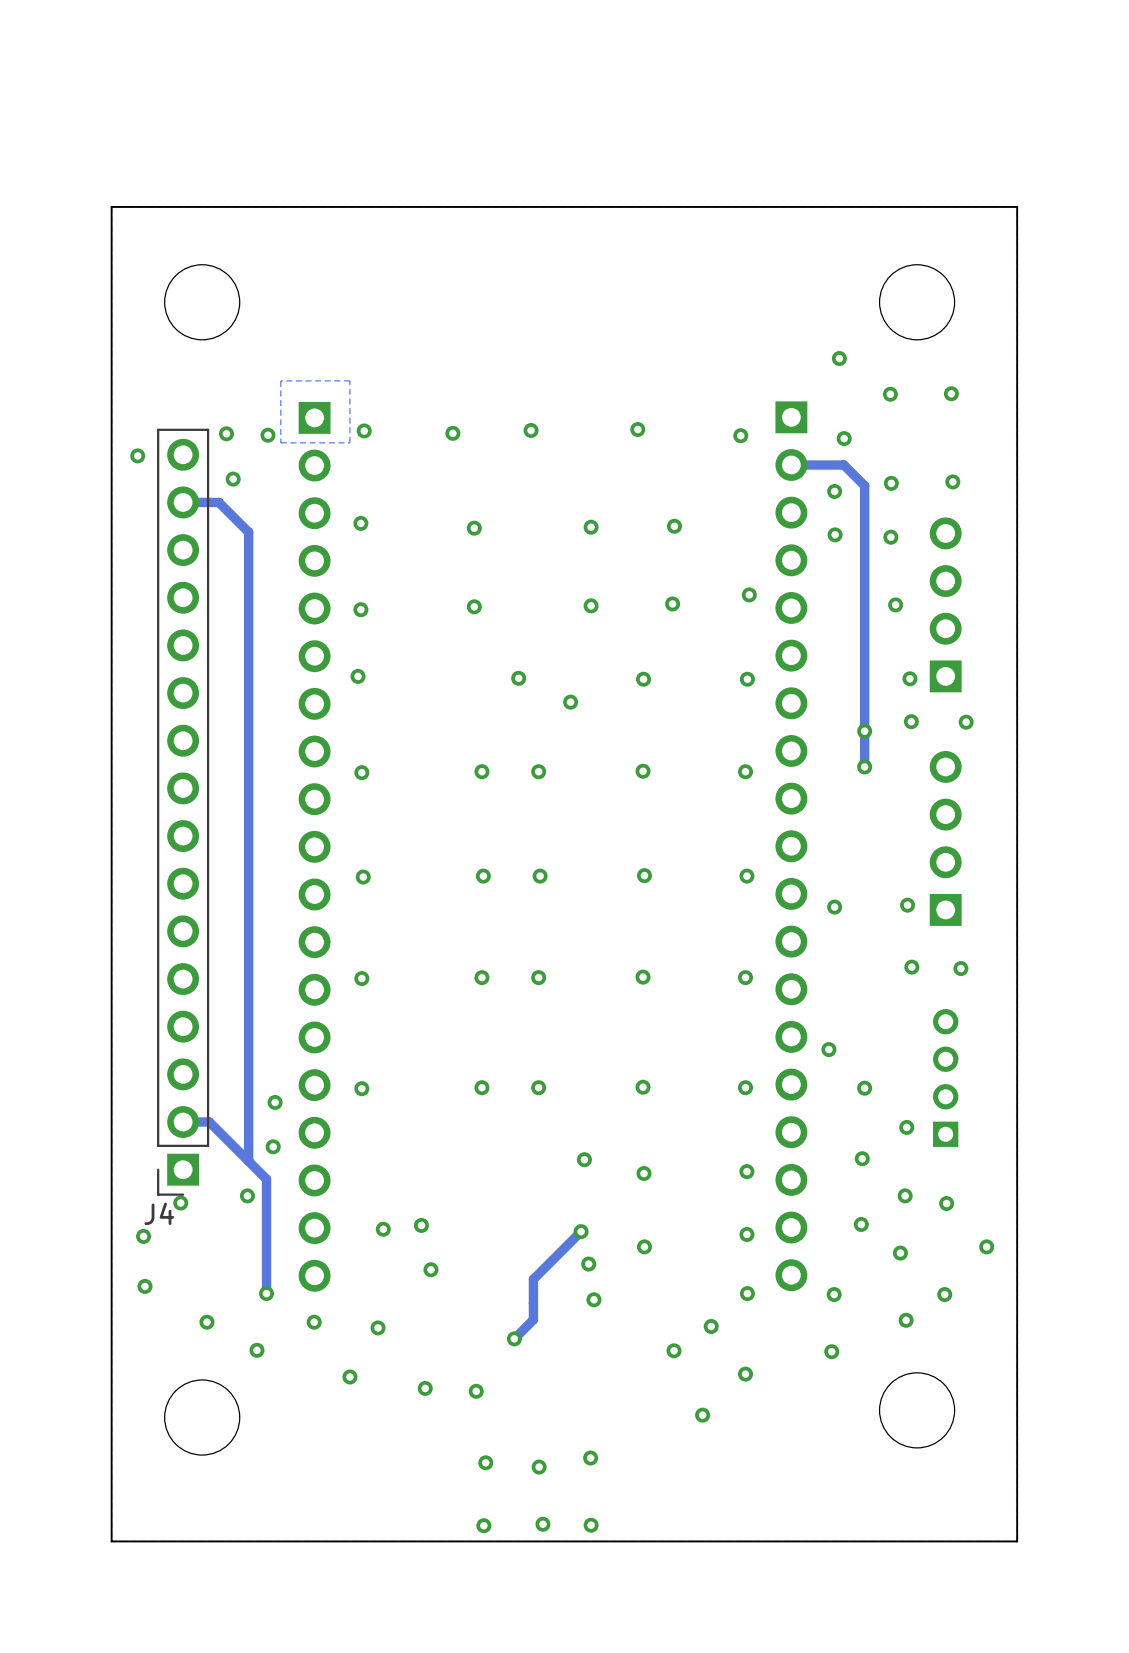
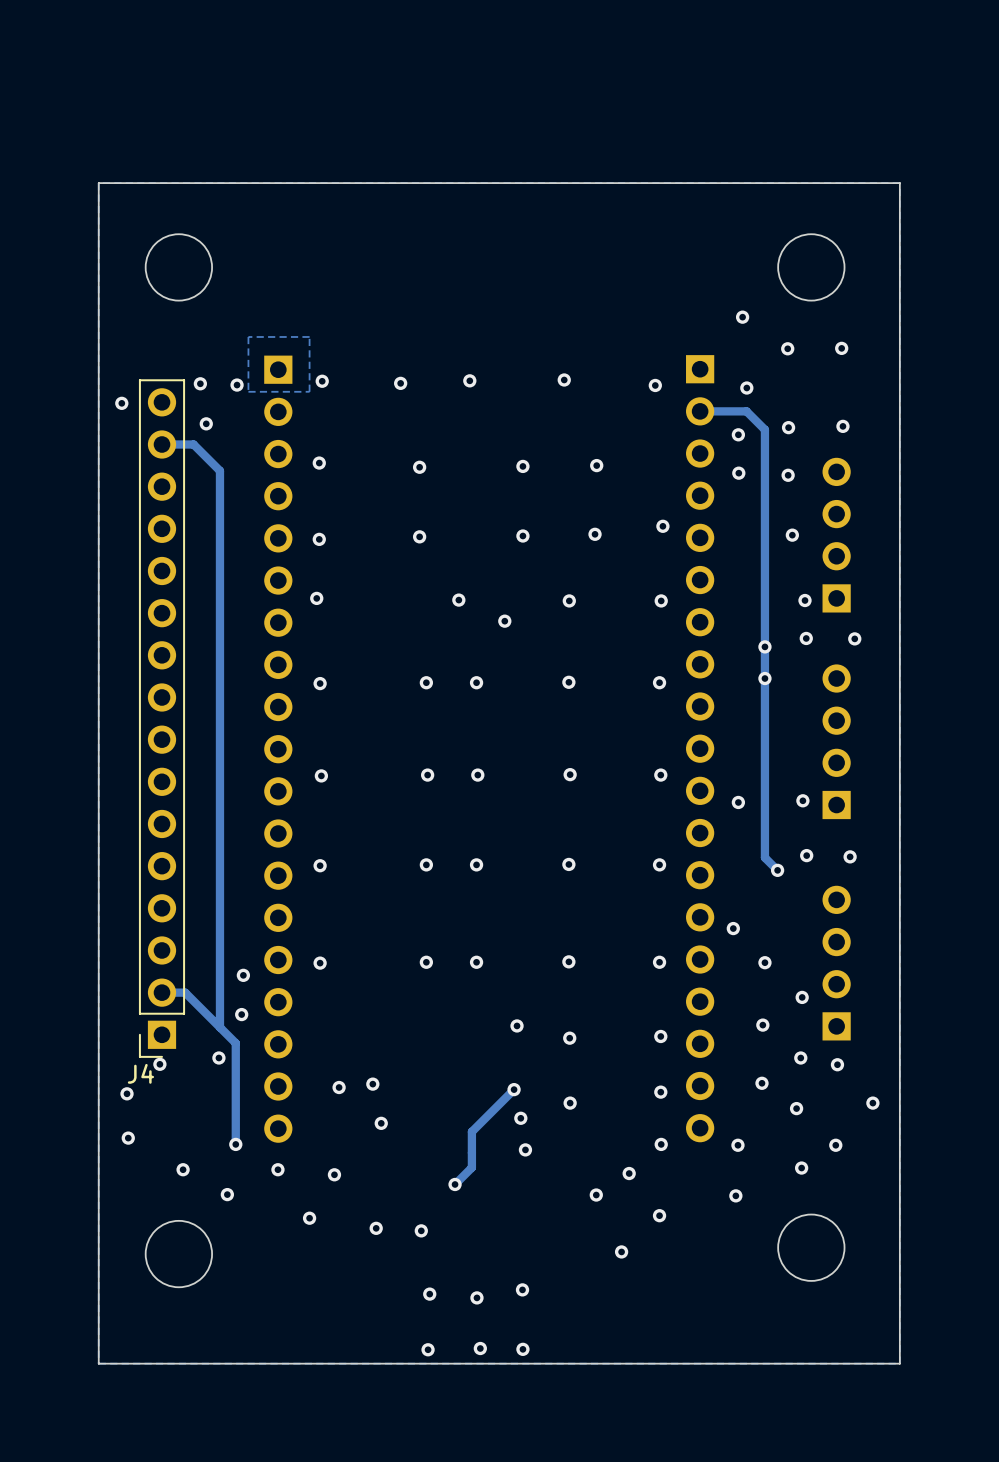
track: none -> (764, 678) (764, 857) (777, 870)
via: none -> (777, 870)
part footprint: [933, 1009, 959, 1147] -> [822, 885, 851, 1041]

